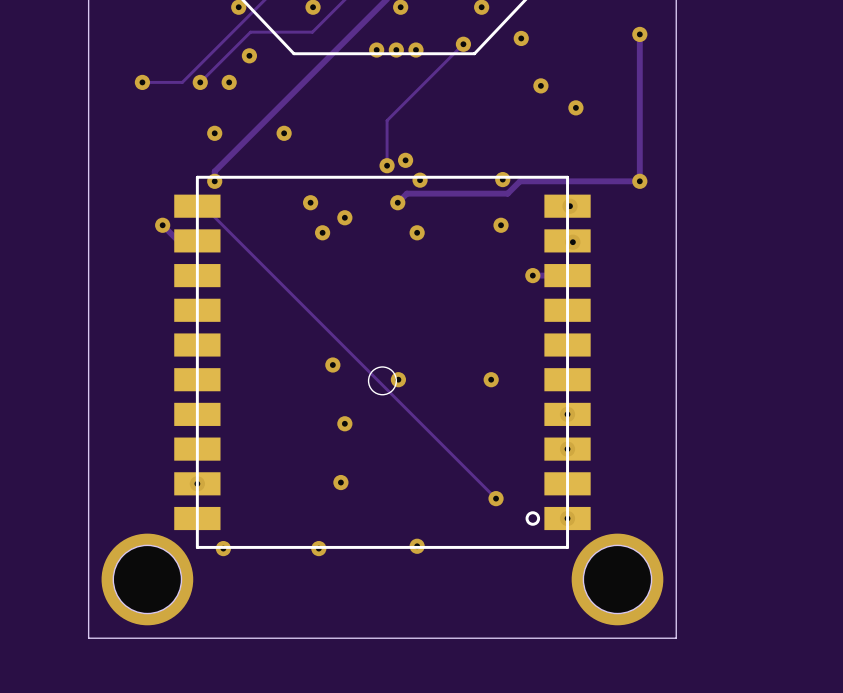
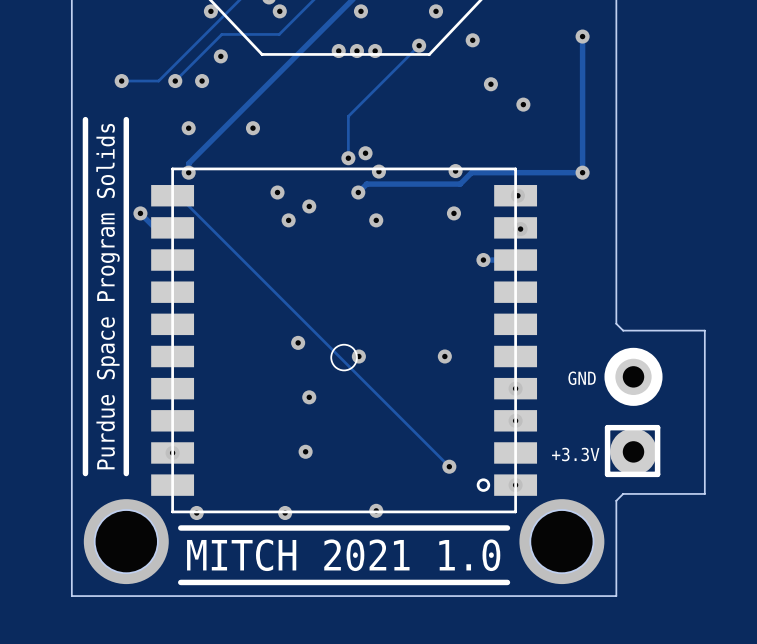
line: none -> (85, 119) (85, 473)
line: none -> (126, 119) (126, 473)
text: none -> Purdue Space Program Solids (108, 296)
board edge: (676, 344) (676, 535) -> (616, 323) (623, 330) (704, 330) (704, 493) (623, 493) (616, 500)
drawing: none -> [604, 347, 663, 406]
text: none -> GND (582, 378)
part: none -> (633, 414)
line: none -> (657, 427) (607, 427) (607, 474) (657, 474) (657, 427)
text: none -> +3.3V (575, 454)
line: none -> (507, 527) (180, 527)
text: none -> MITCH 2021 1.0 (343, 555)
line: none -> (507, 582) (180, 582)

